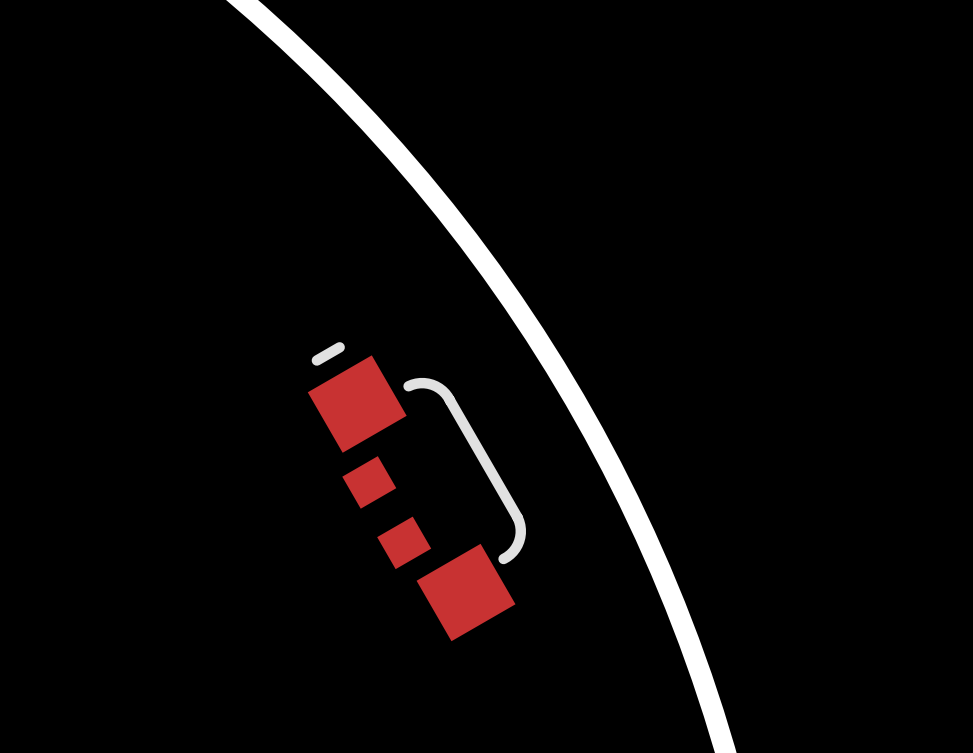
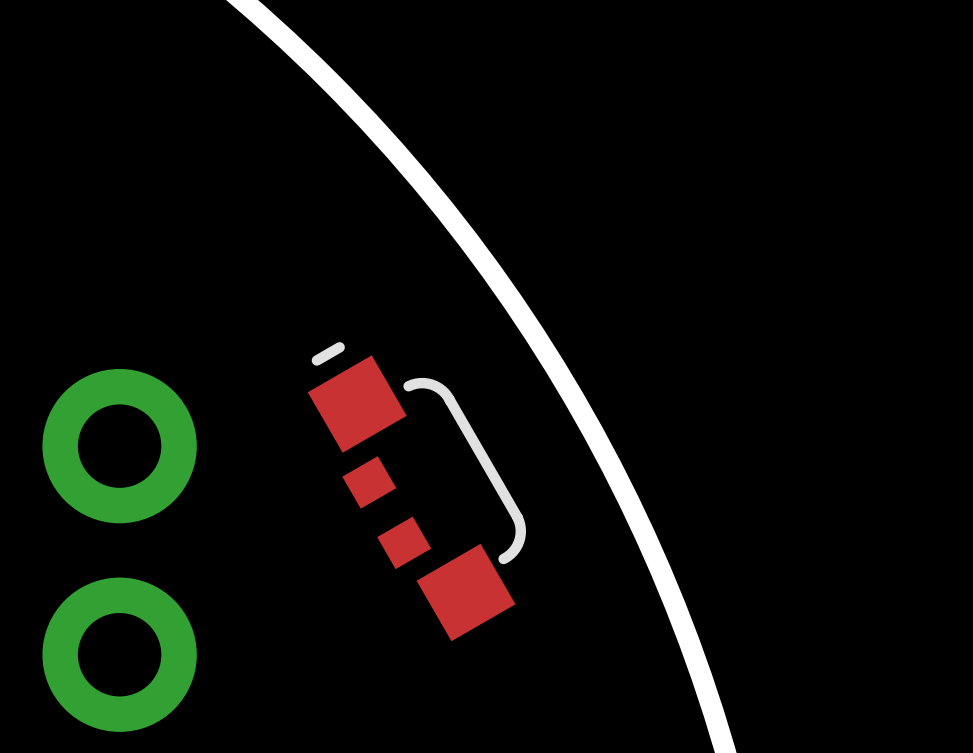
part: none -> (119, 550)

